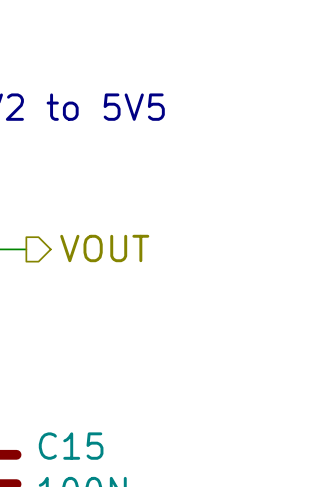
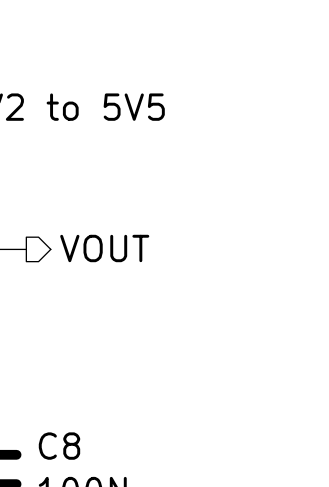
C15 name: C15 (71, 446) -> C8 (59, 446)

